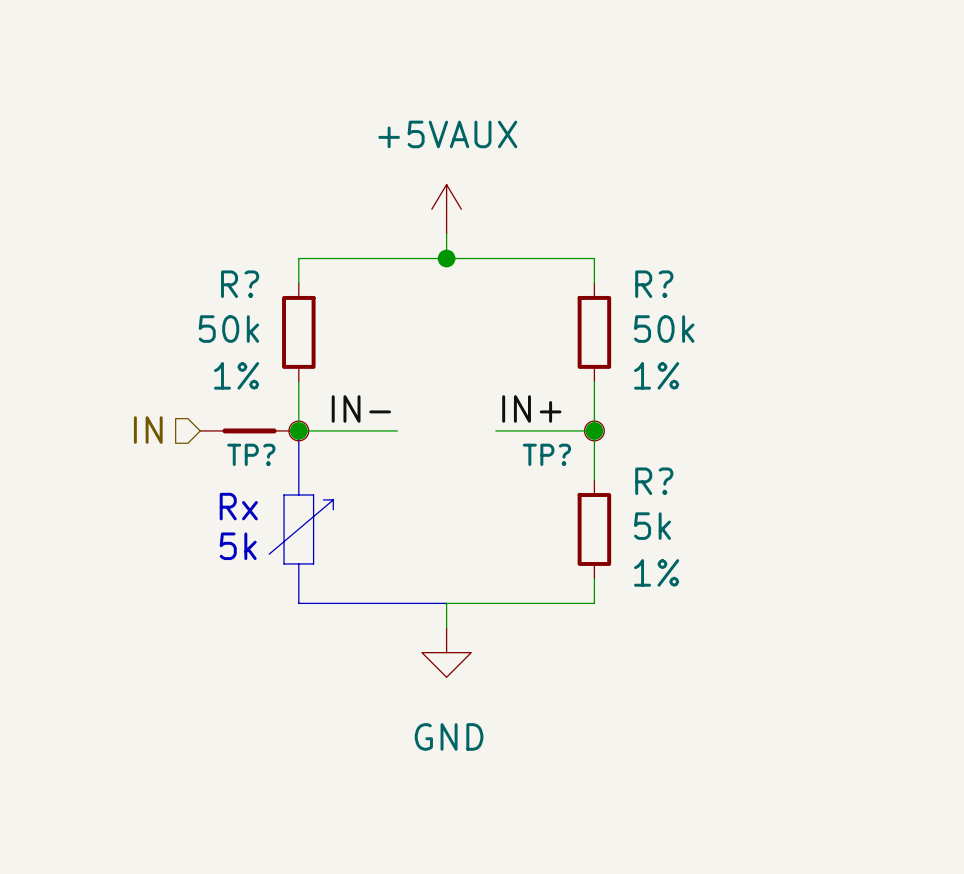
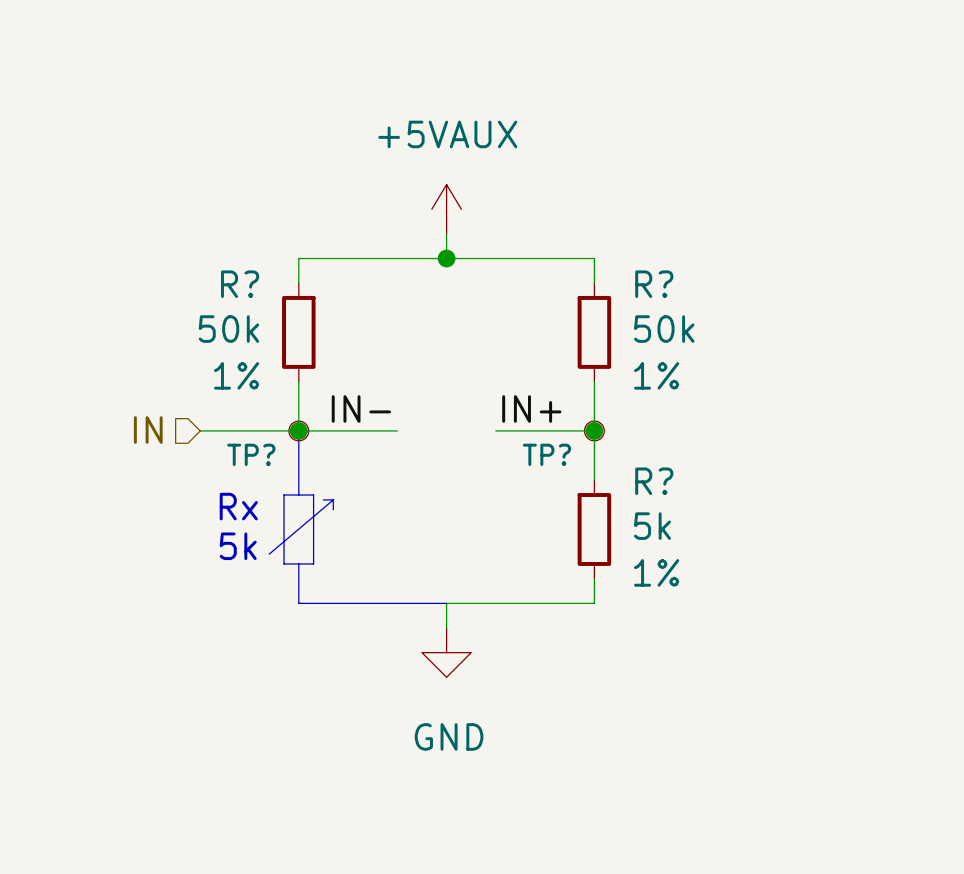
part: (249, 430) -> none

